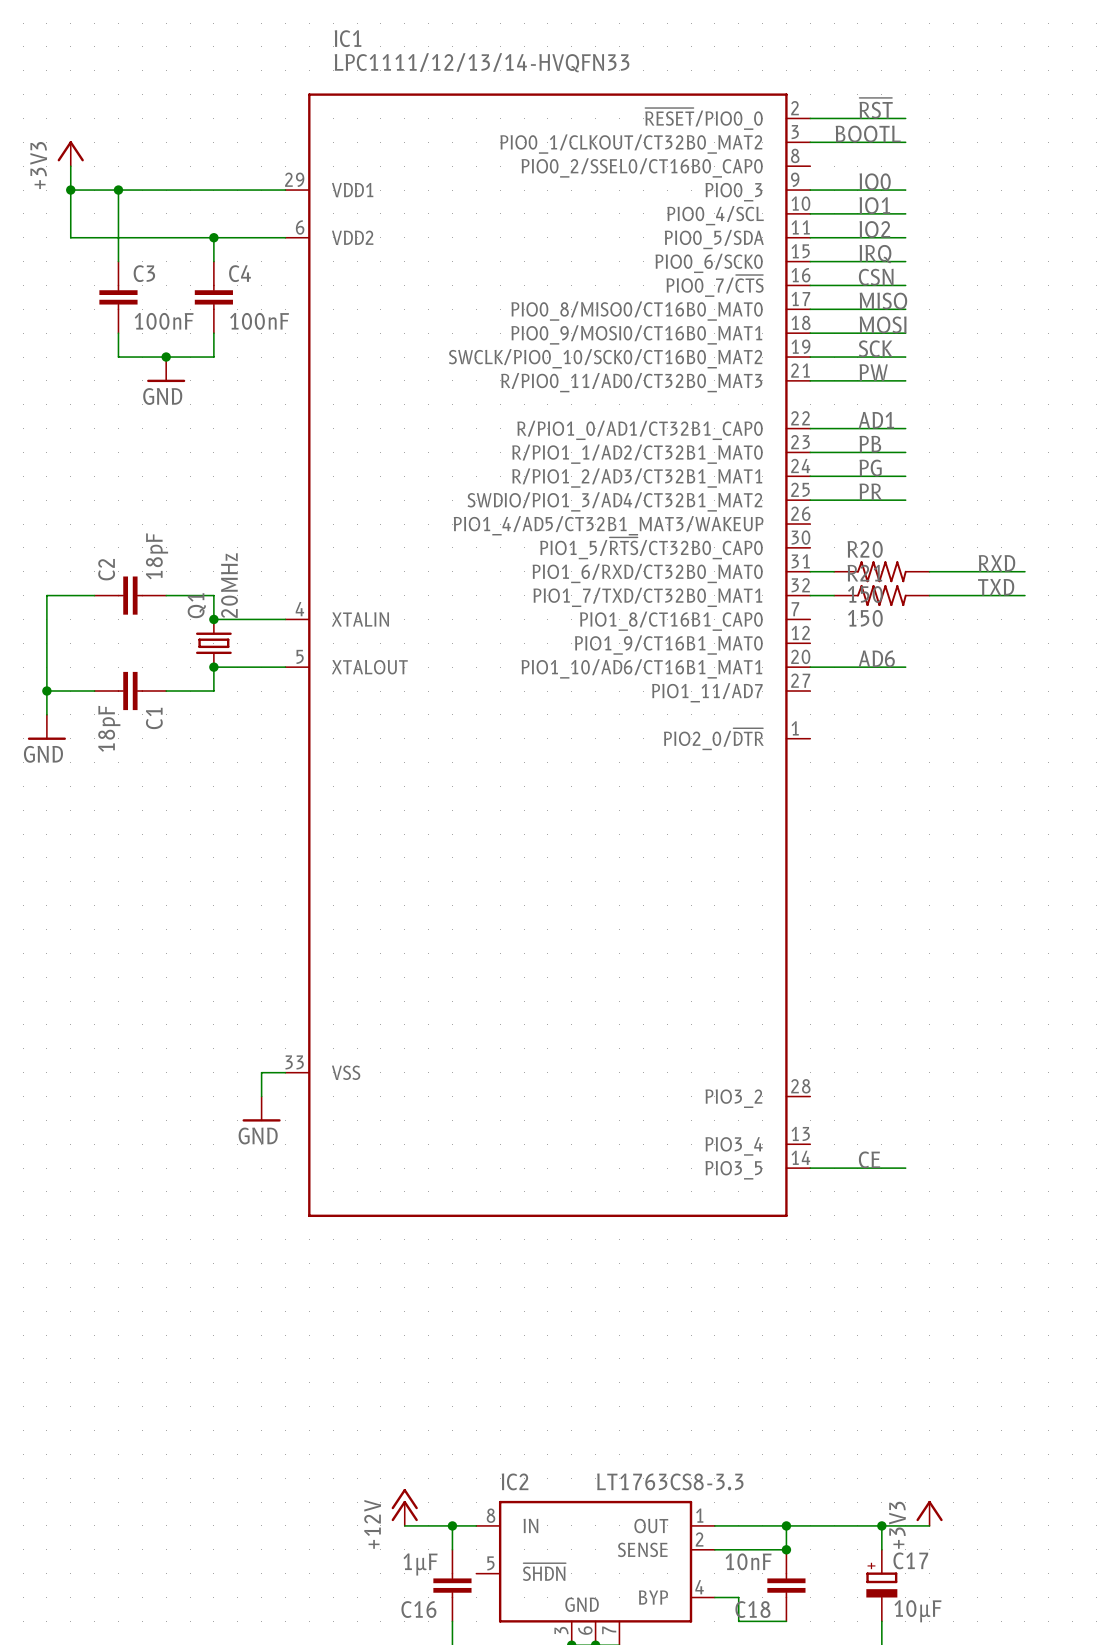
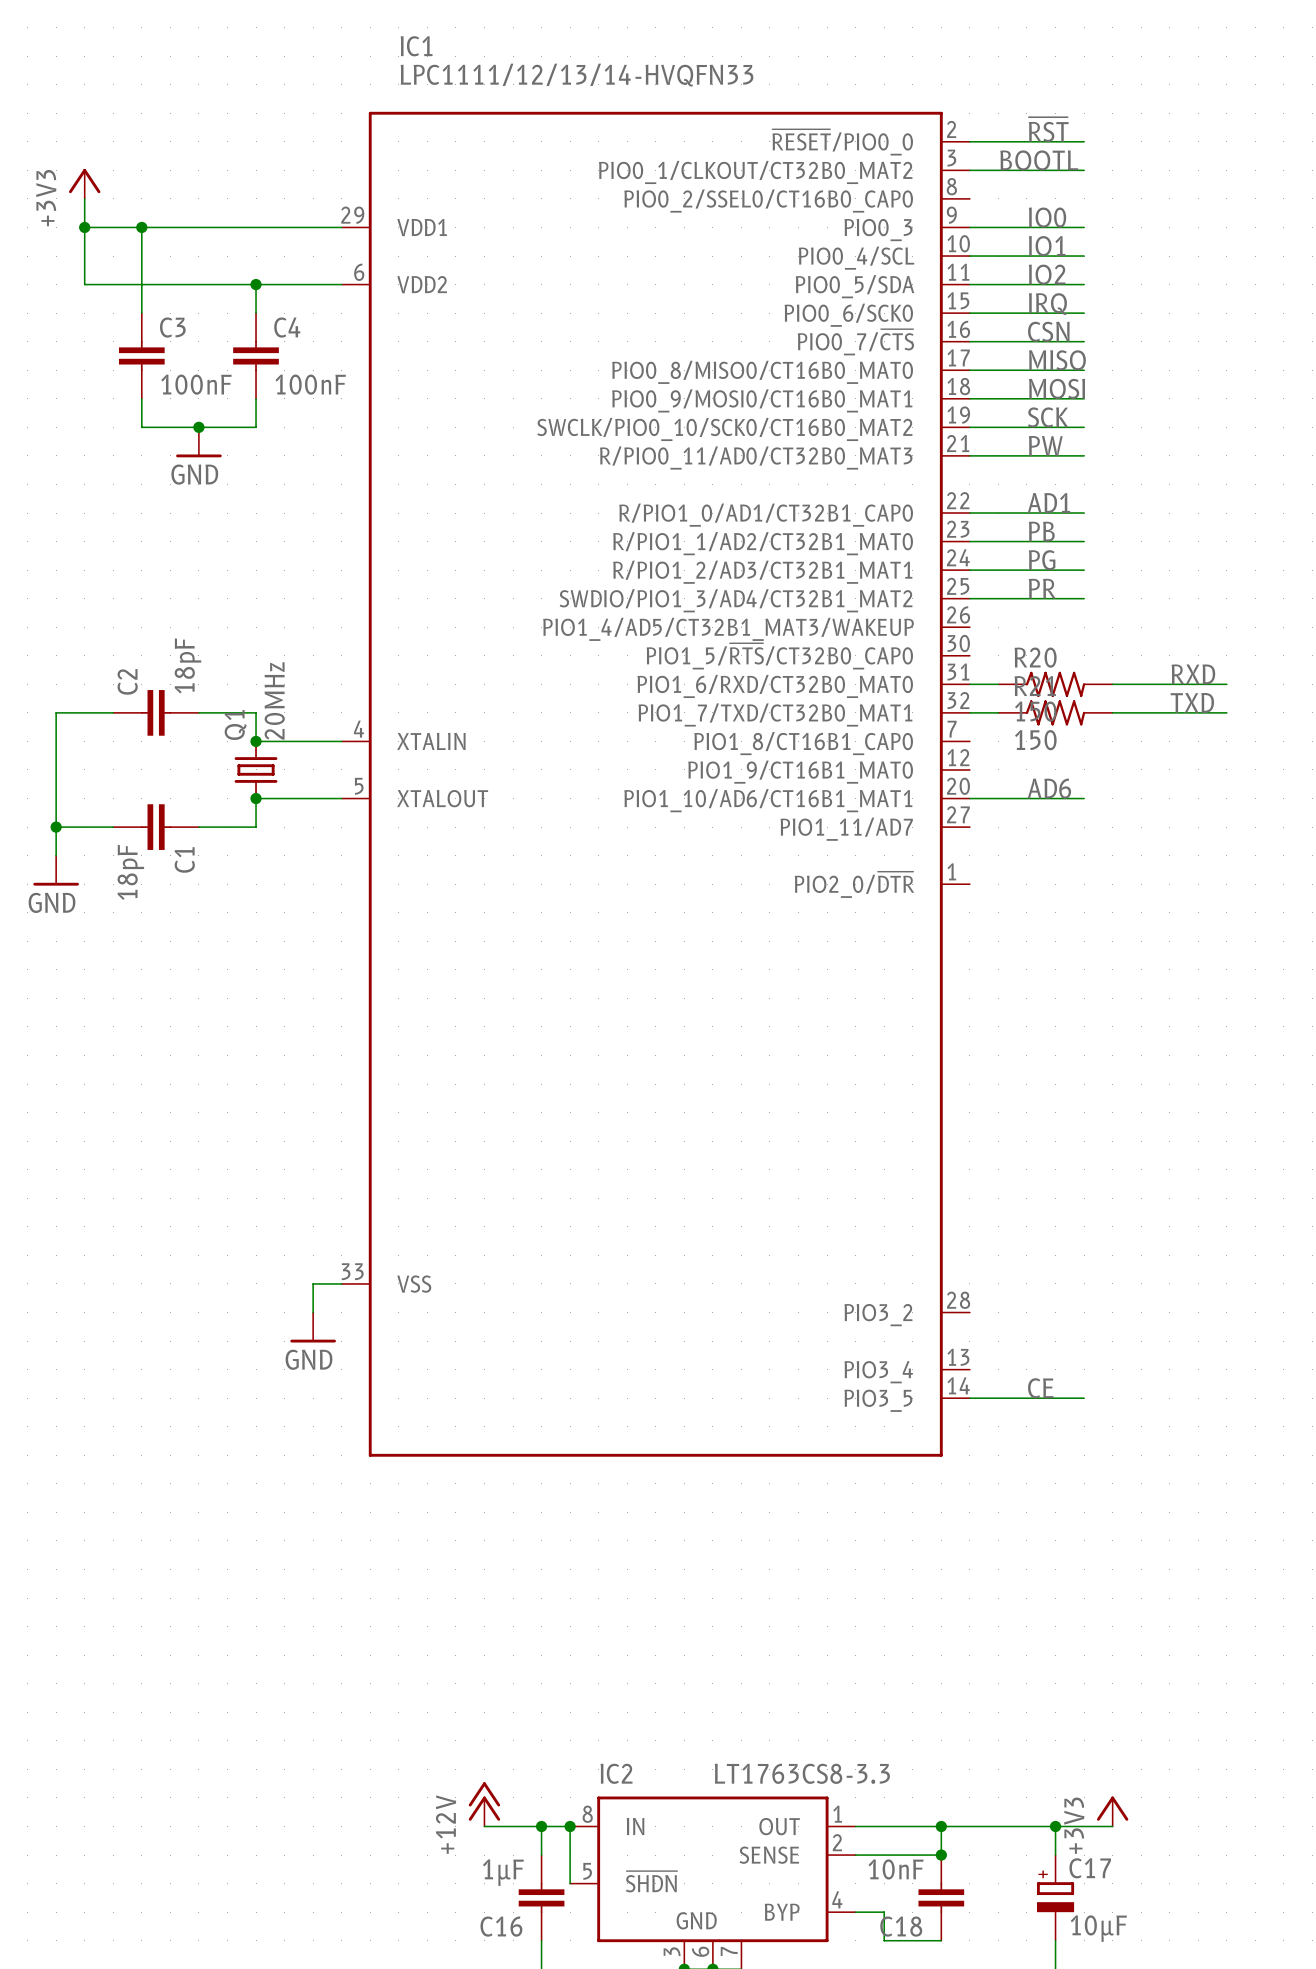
wire: none -> (570, 1826) (570, 1883)
junction: none -> (570, 1826)

